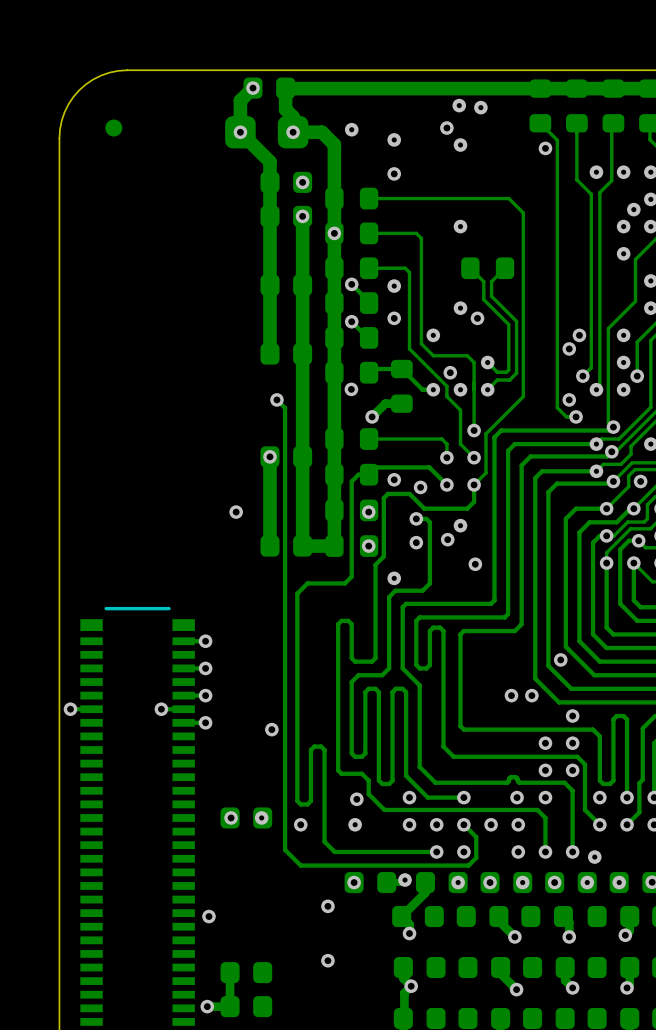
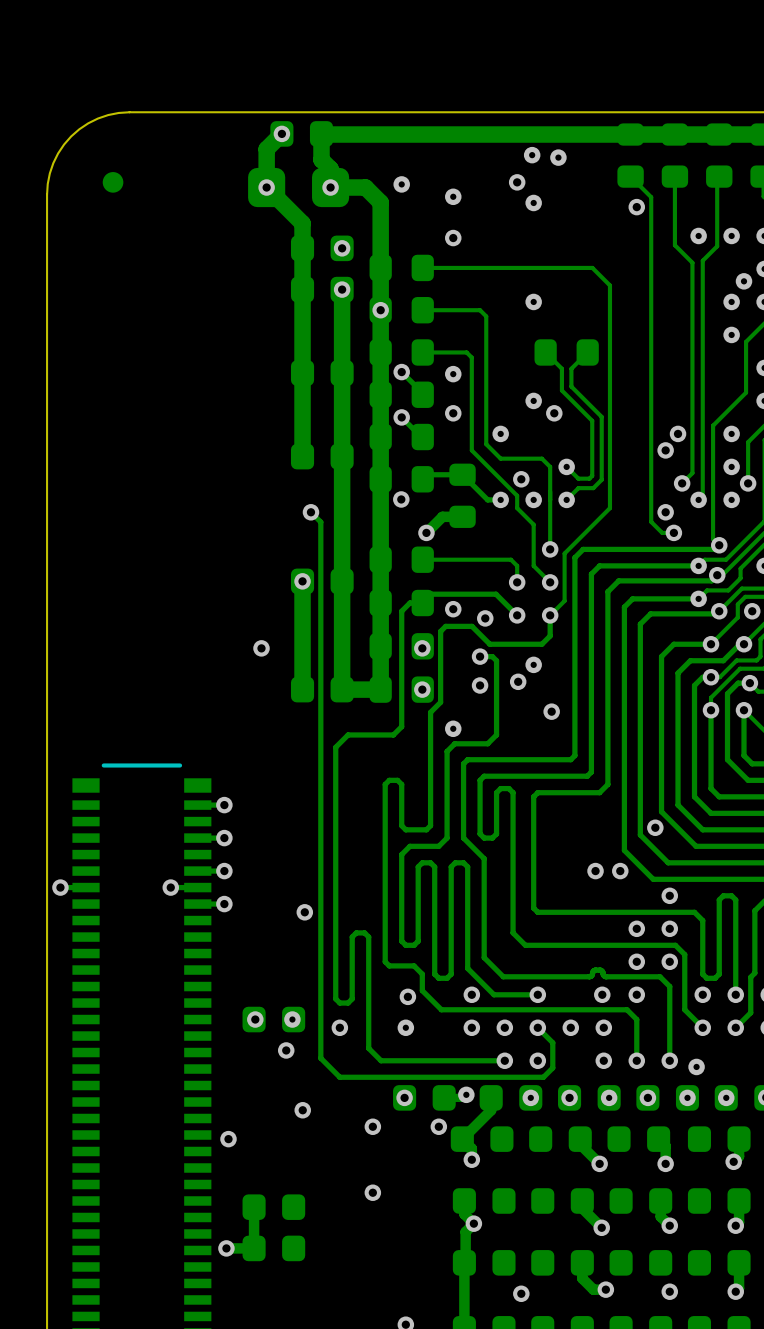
via: none -> (286, 1050)
via: none -> (302, 1110)
via: none -> (438, 1126)

